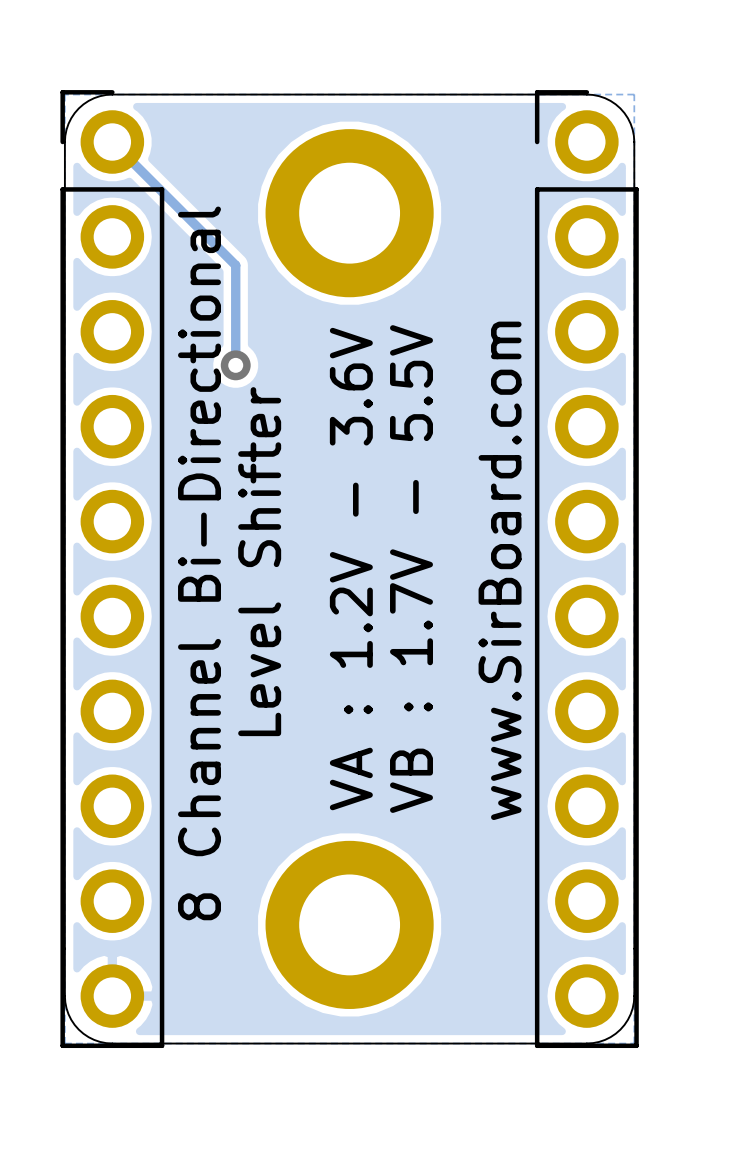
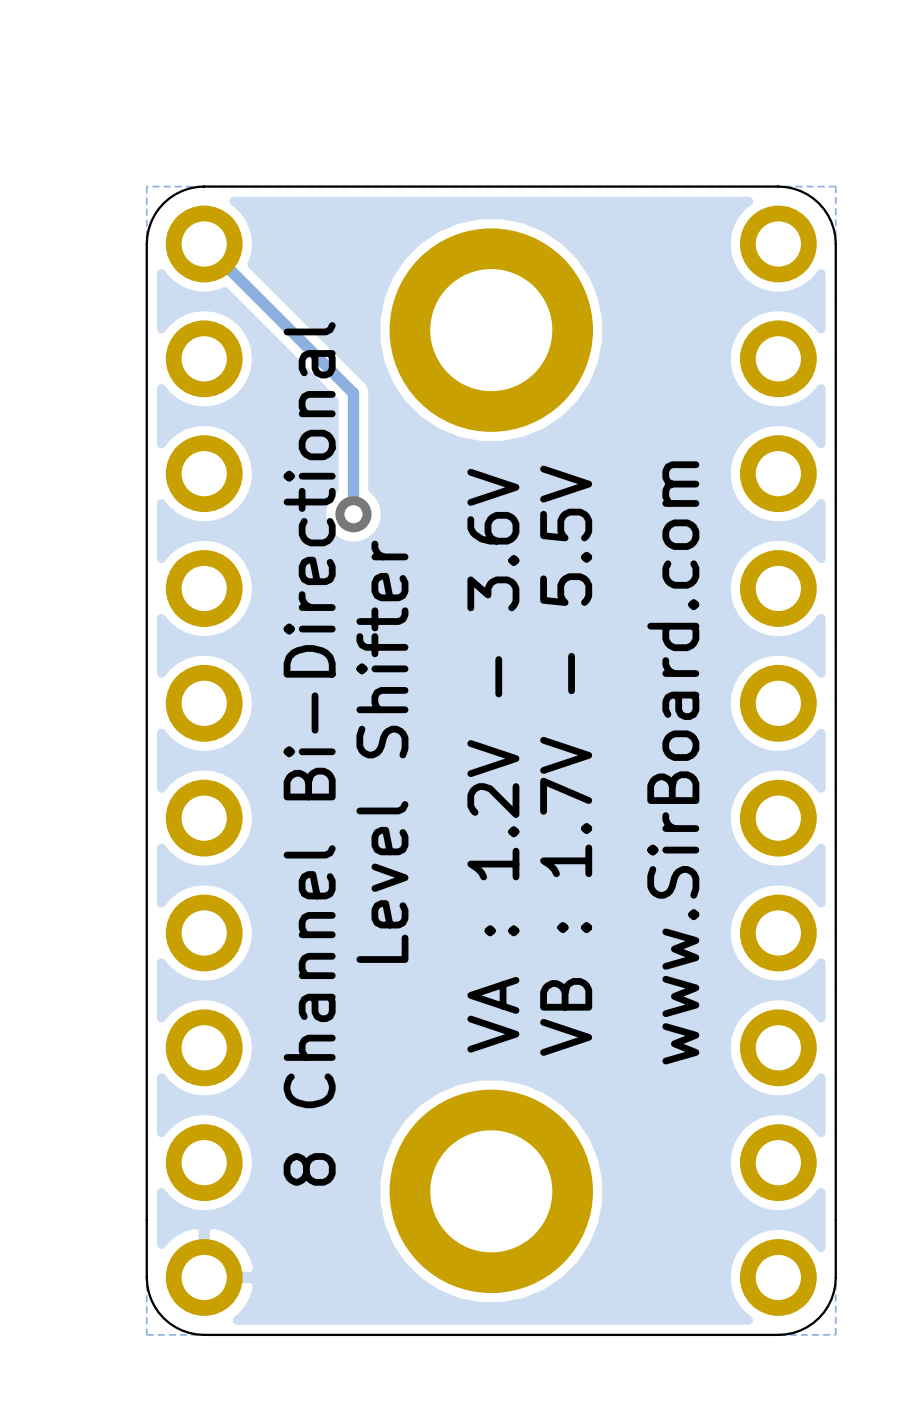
part footprint: [60, 90, 165, 1049] -> [165, 205, 243, 1316]
part footprint: [534, 90, 639, 1049] -> [739, 205, 817, 1316]

